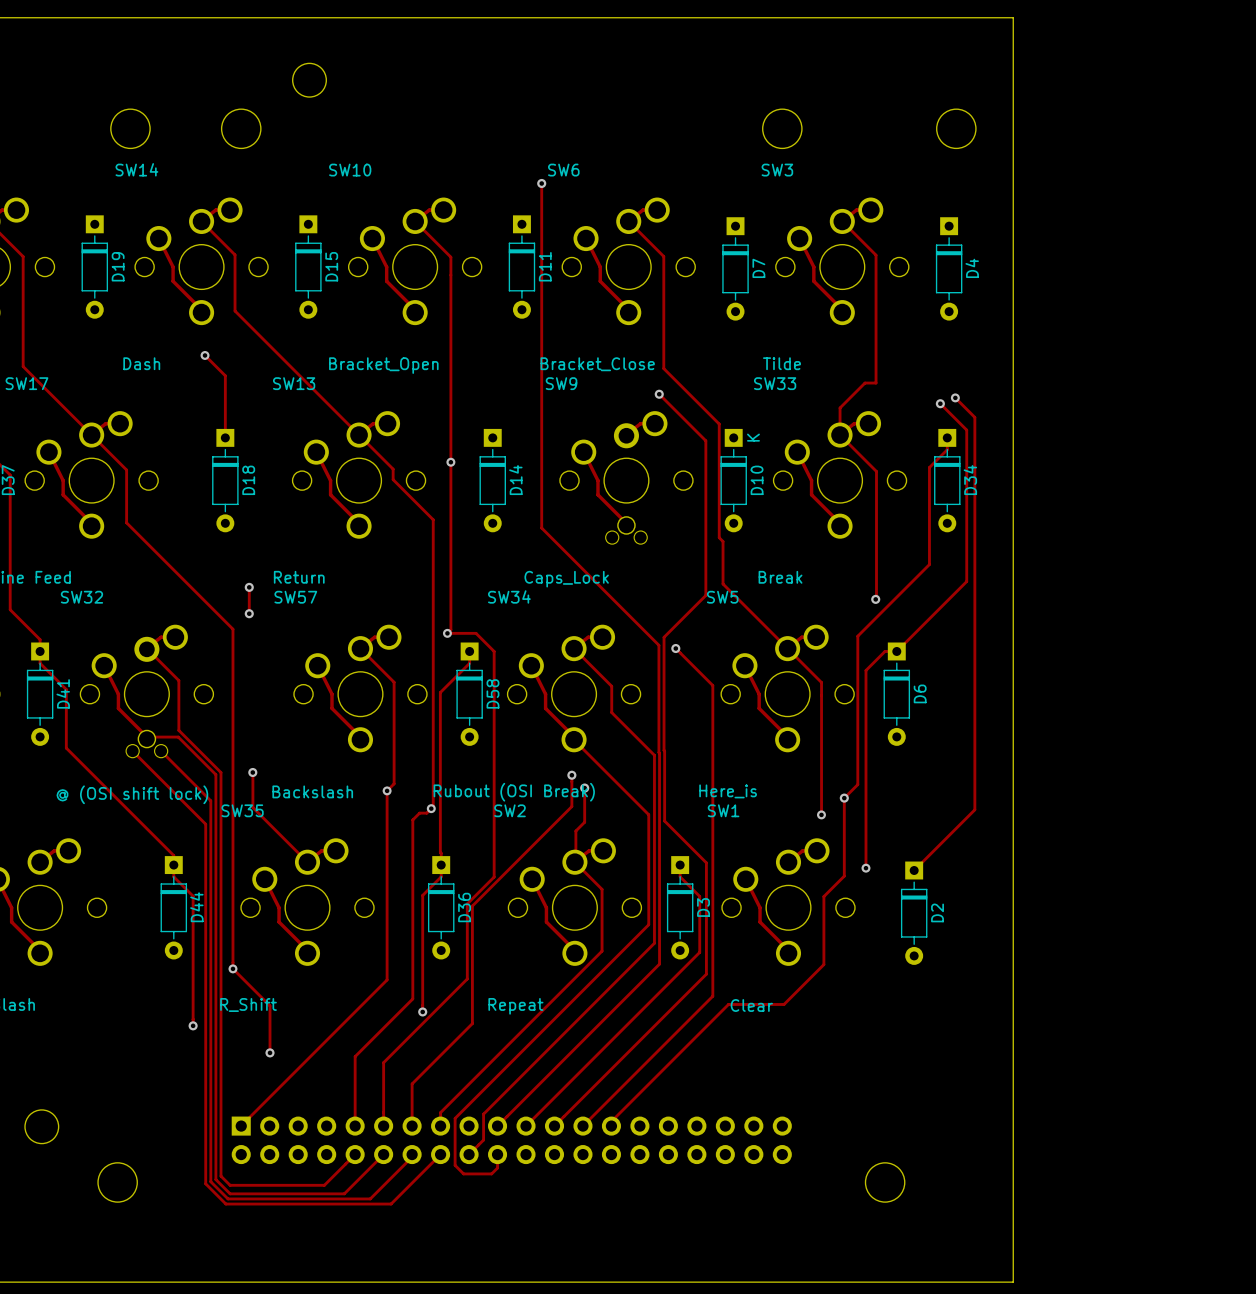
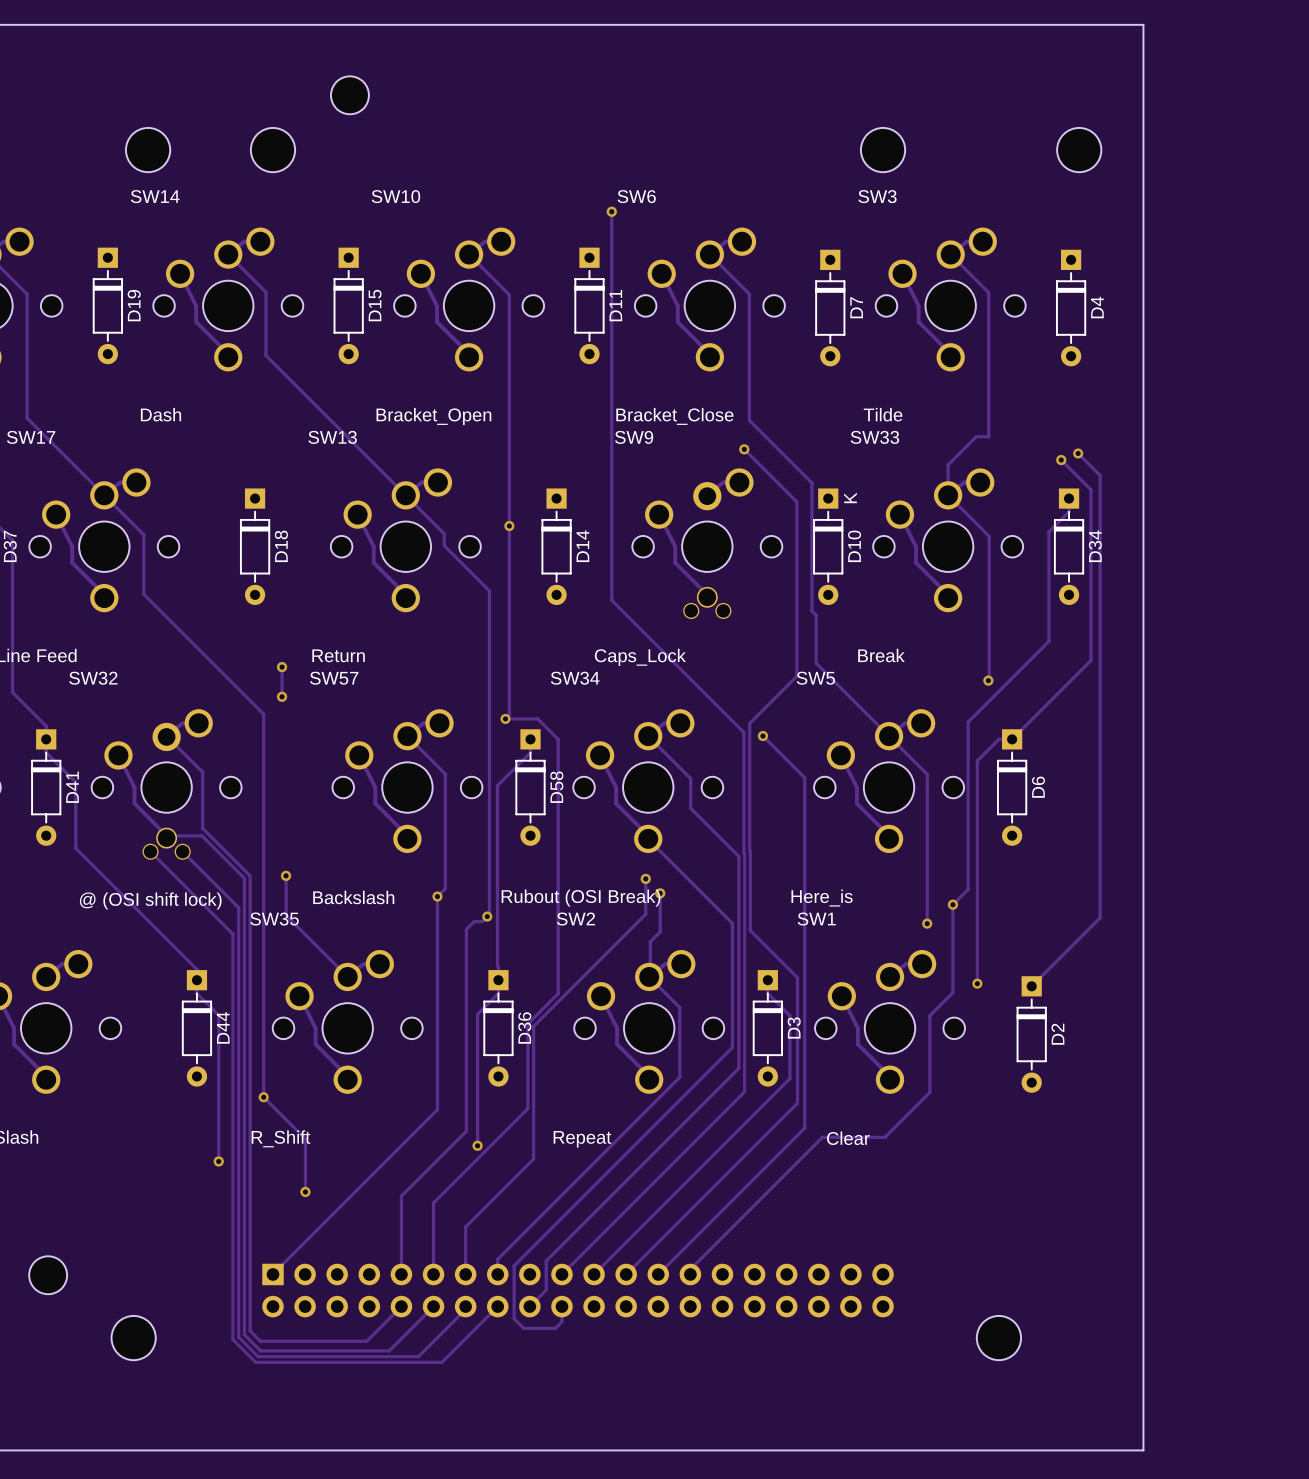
track: (205, 355) (225, 375) (225, 437) -> none
via: (205, 355) -> none

